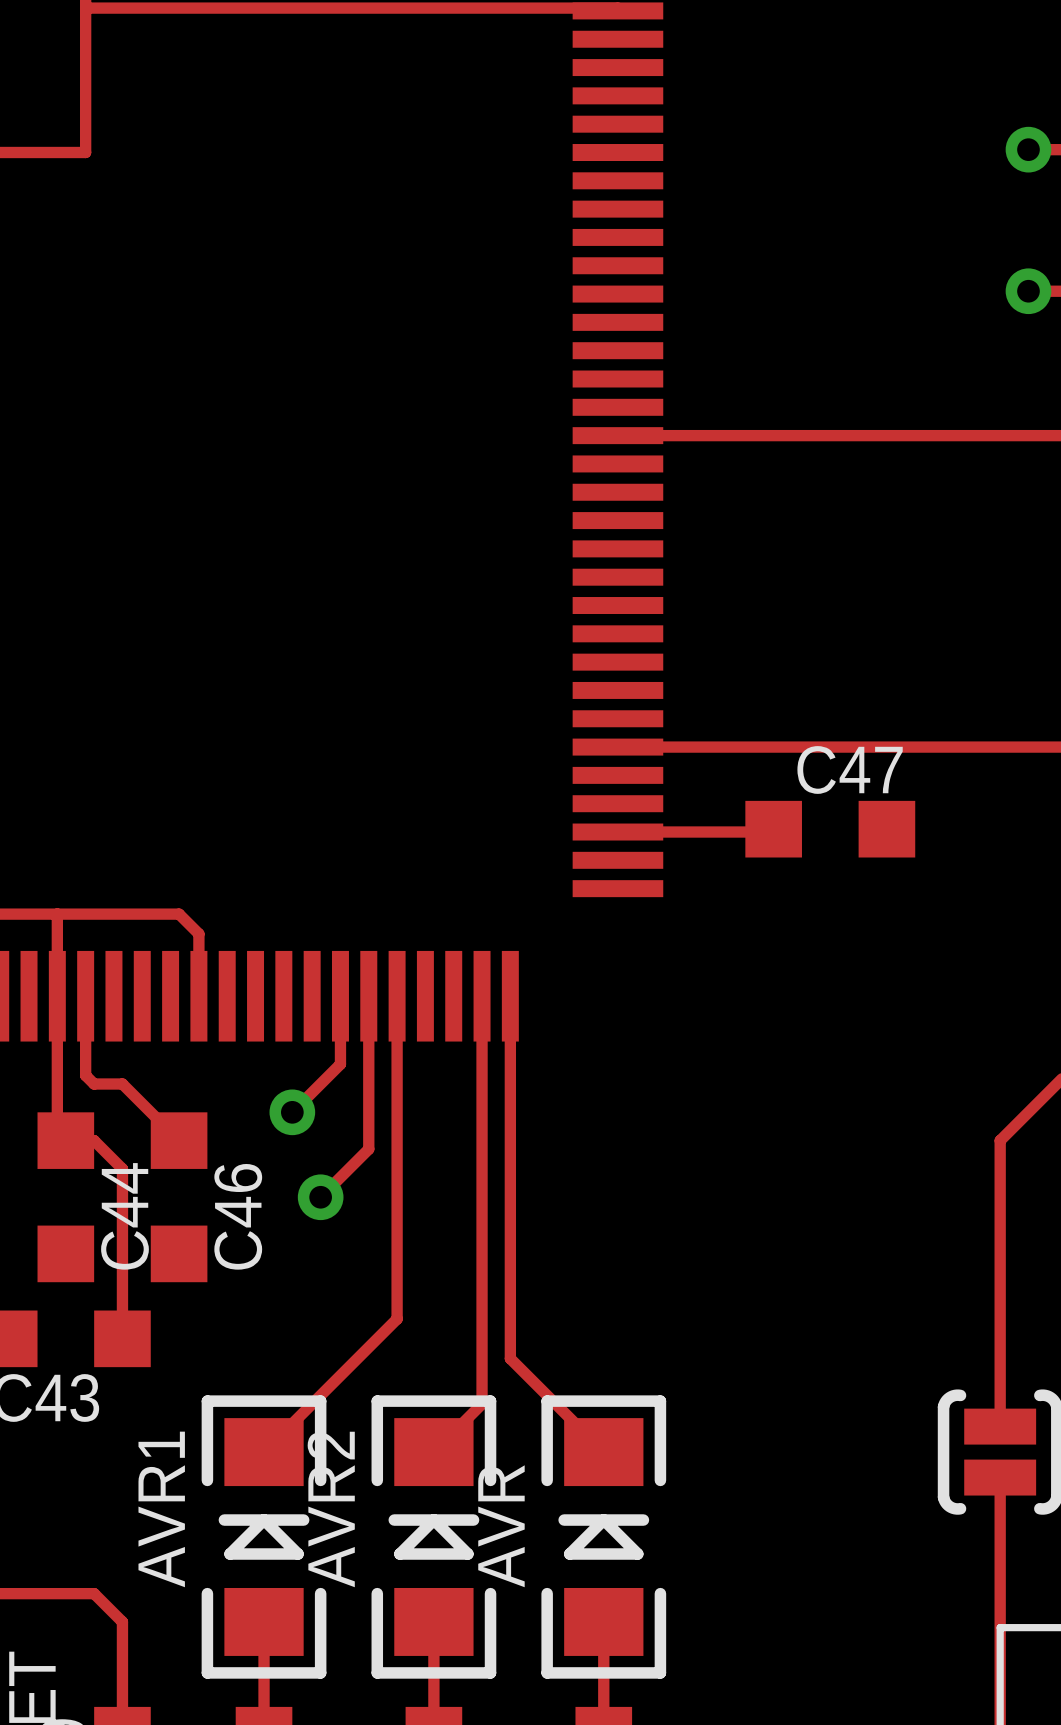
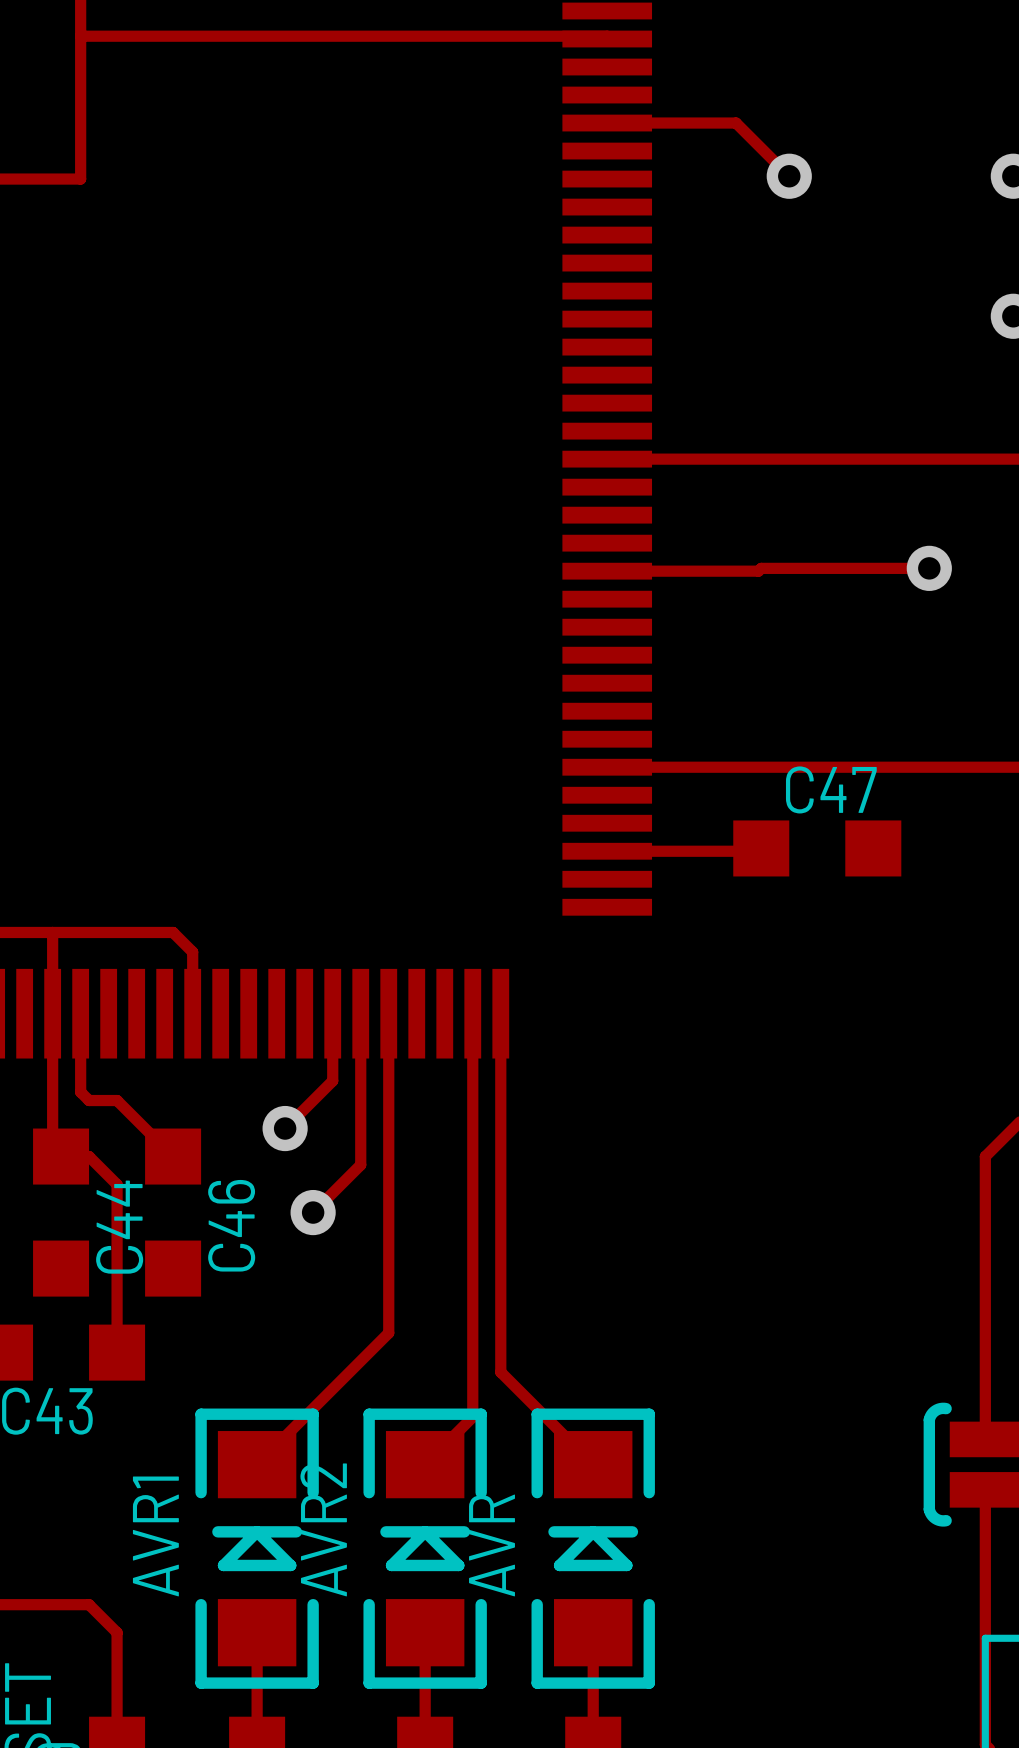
track: none -> (607, 123) (736, 123) (789, 176)
via: none -> (789, 176)
track: none -> (929, 568) (607, 571)
via: none -> (929, 568)

